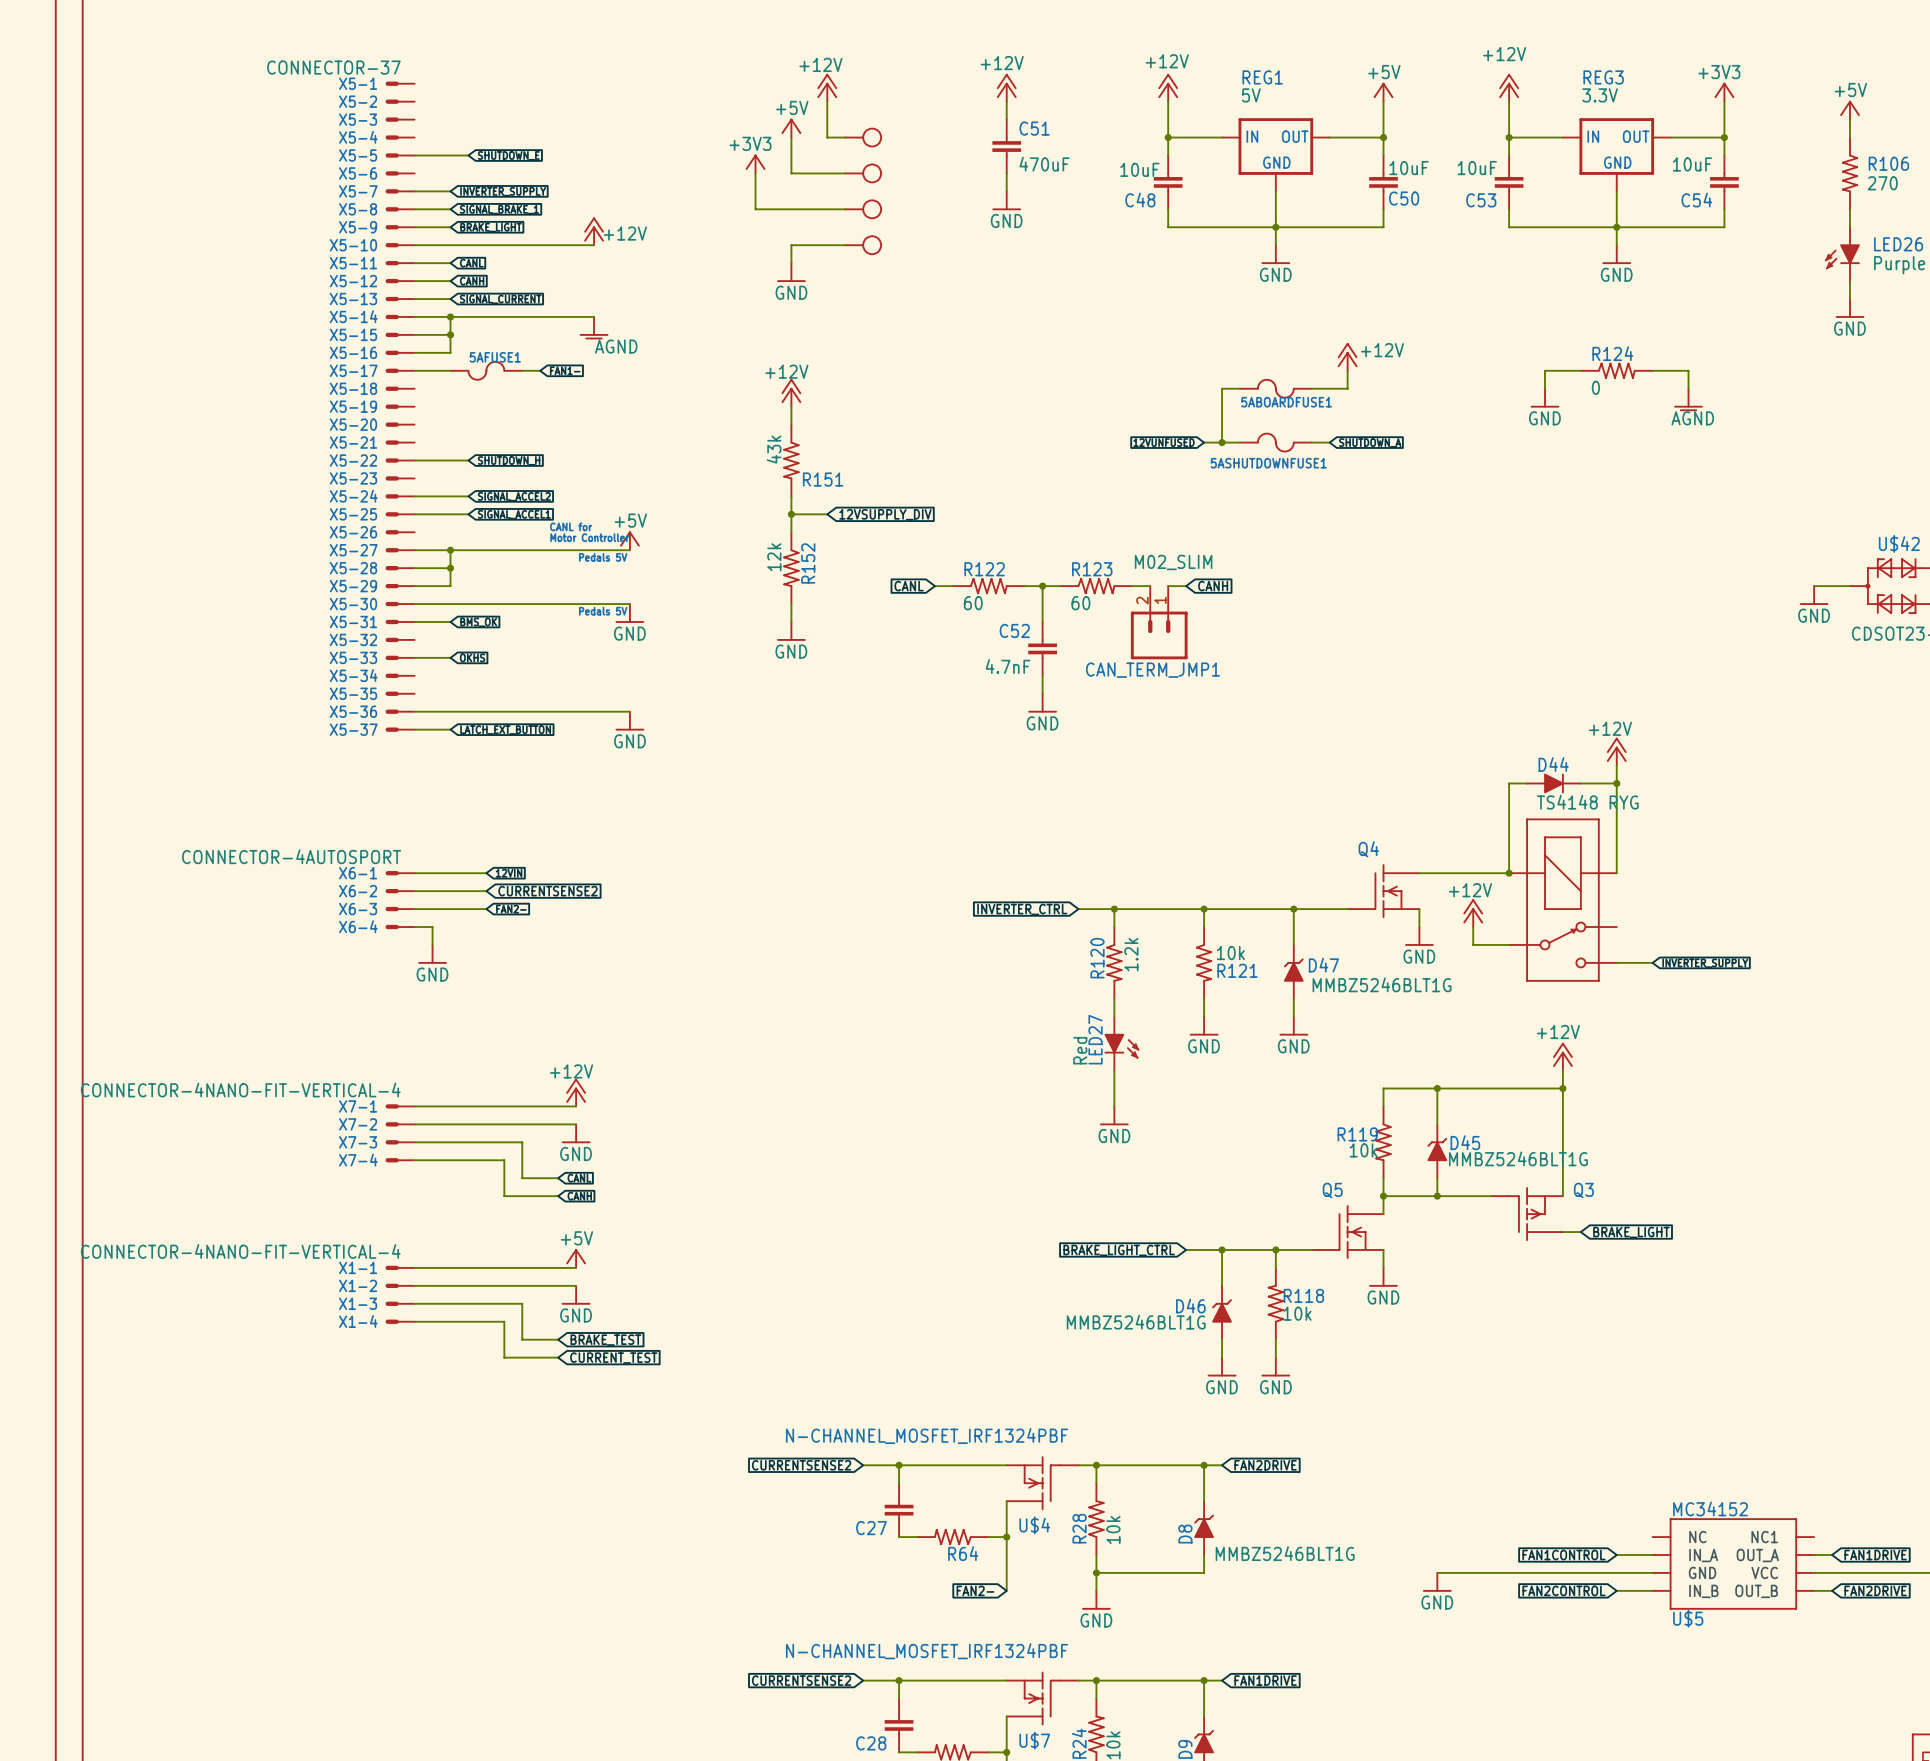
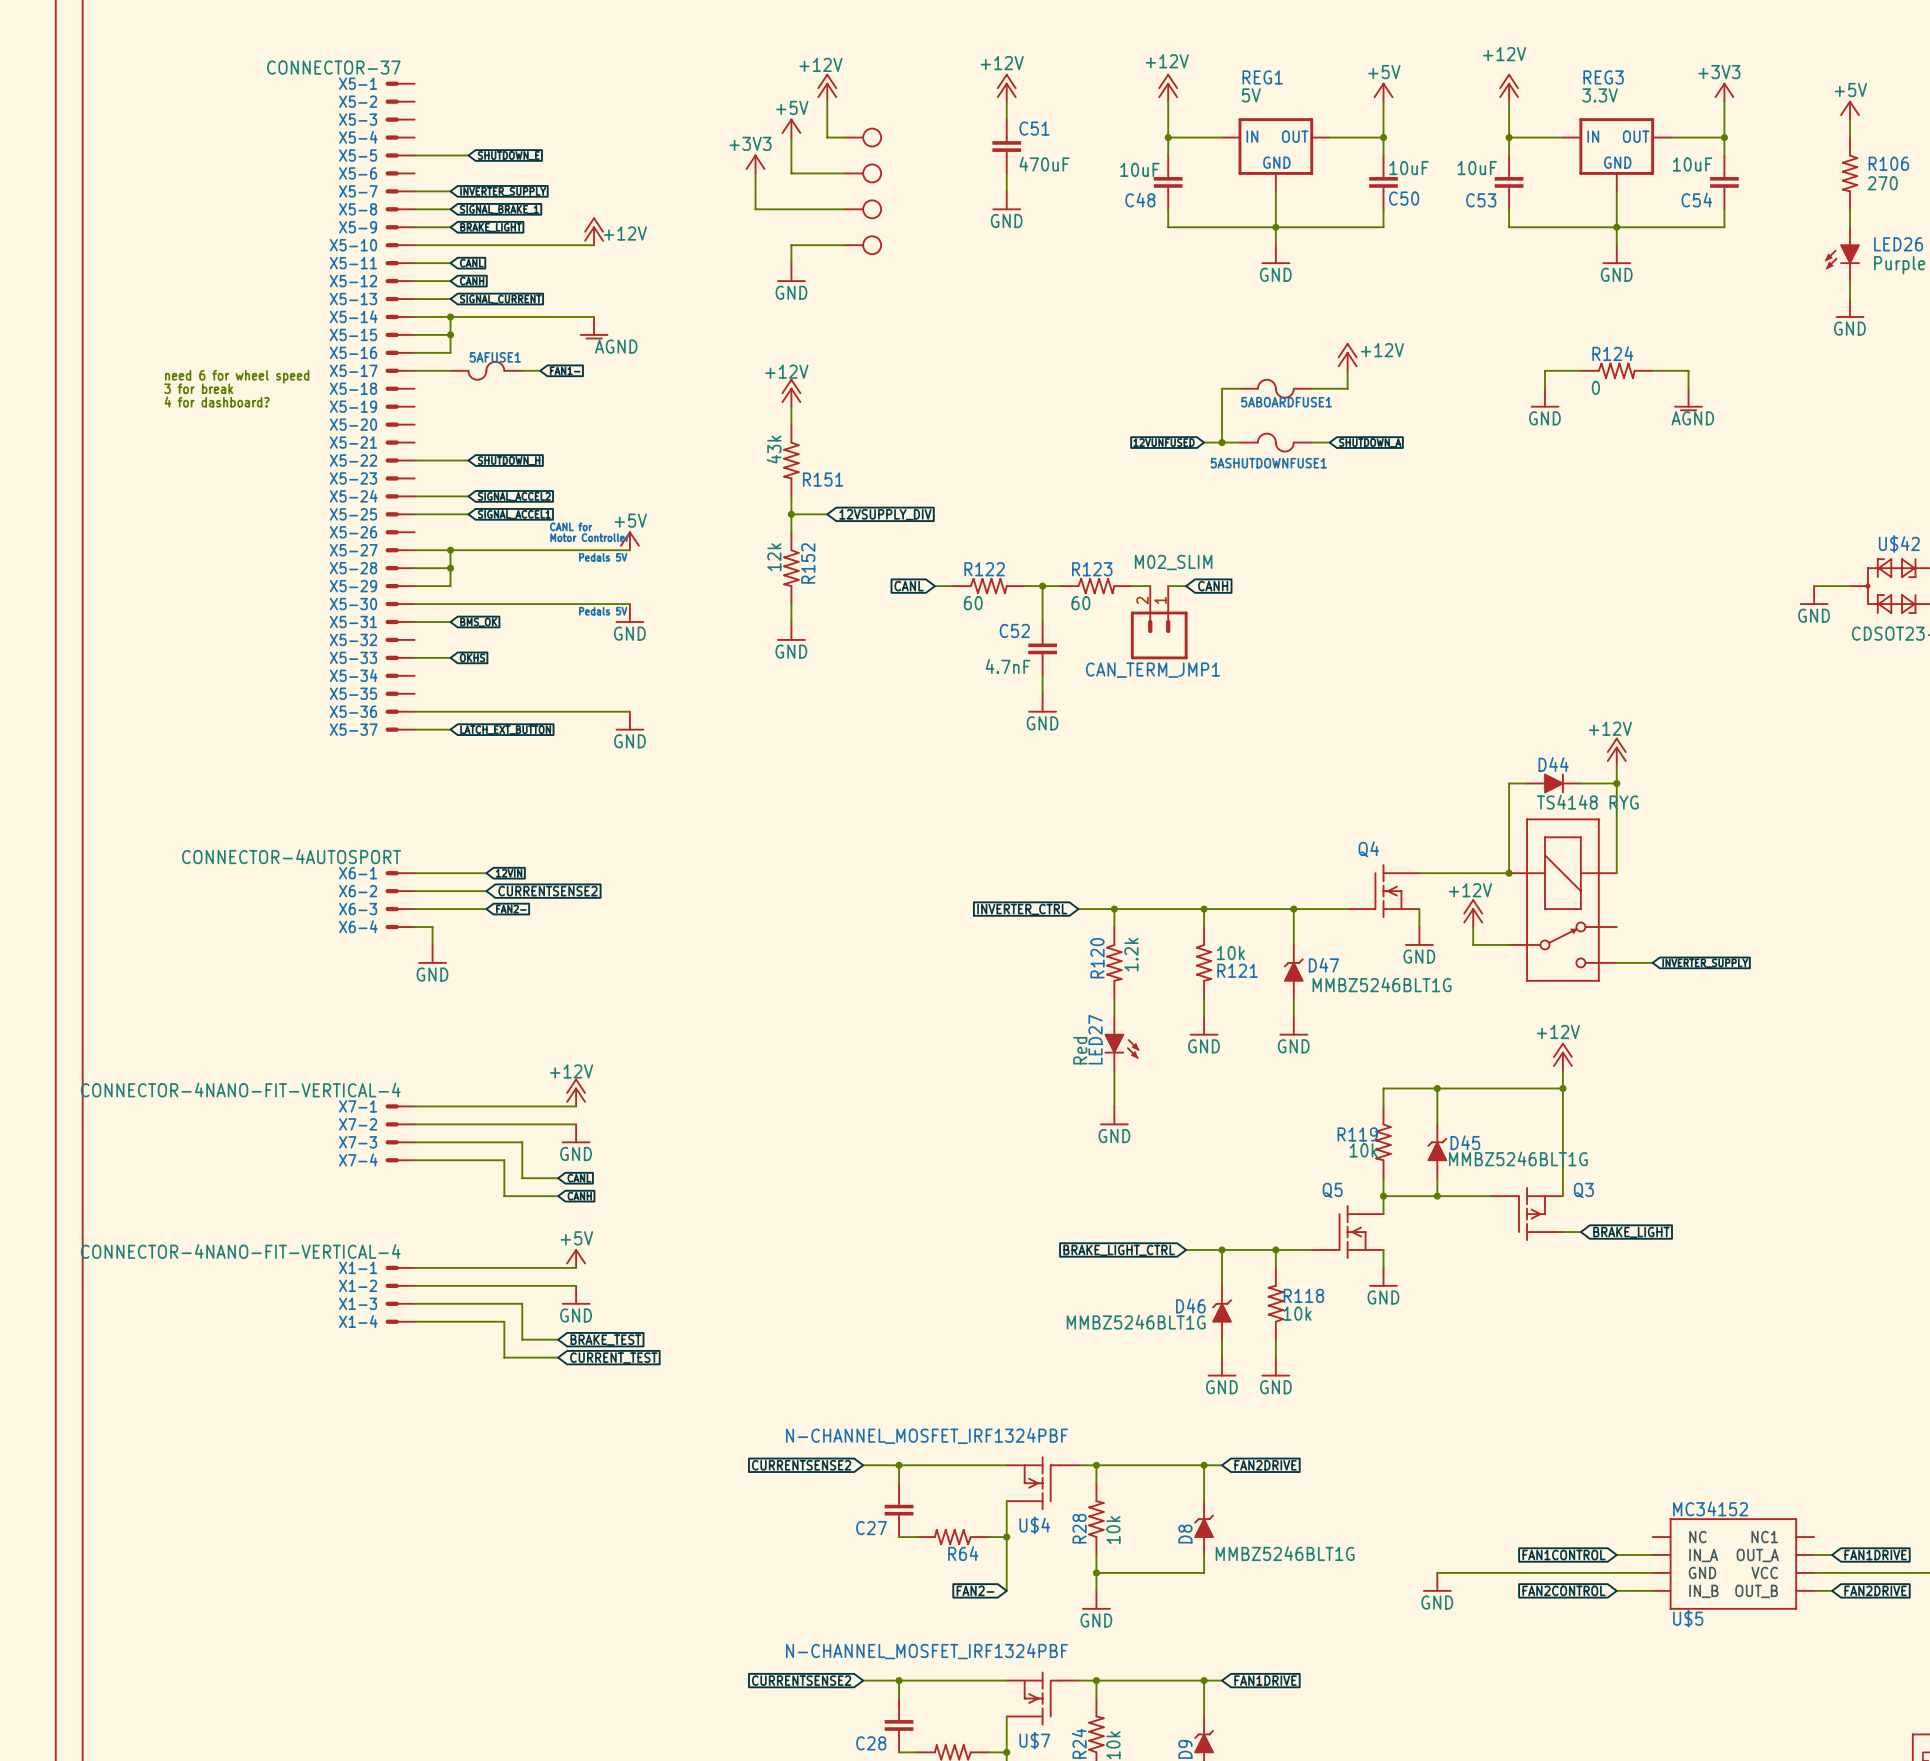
text: none -> need 6 for wheel speed (237, 376)
text: none -> 3 for break (198, 388)
text: none -> 4 for dashboard? (217, 401)

